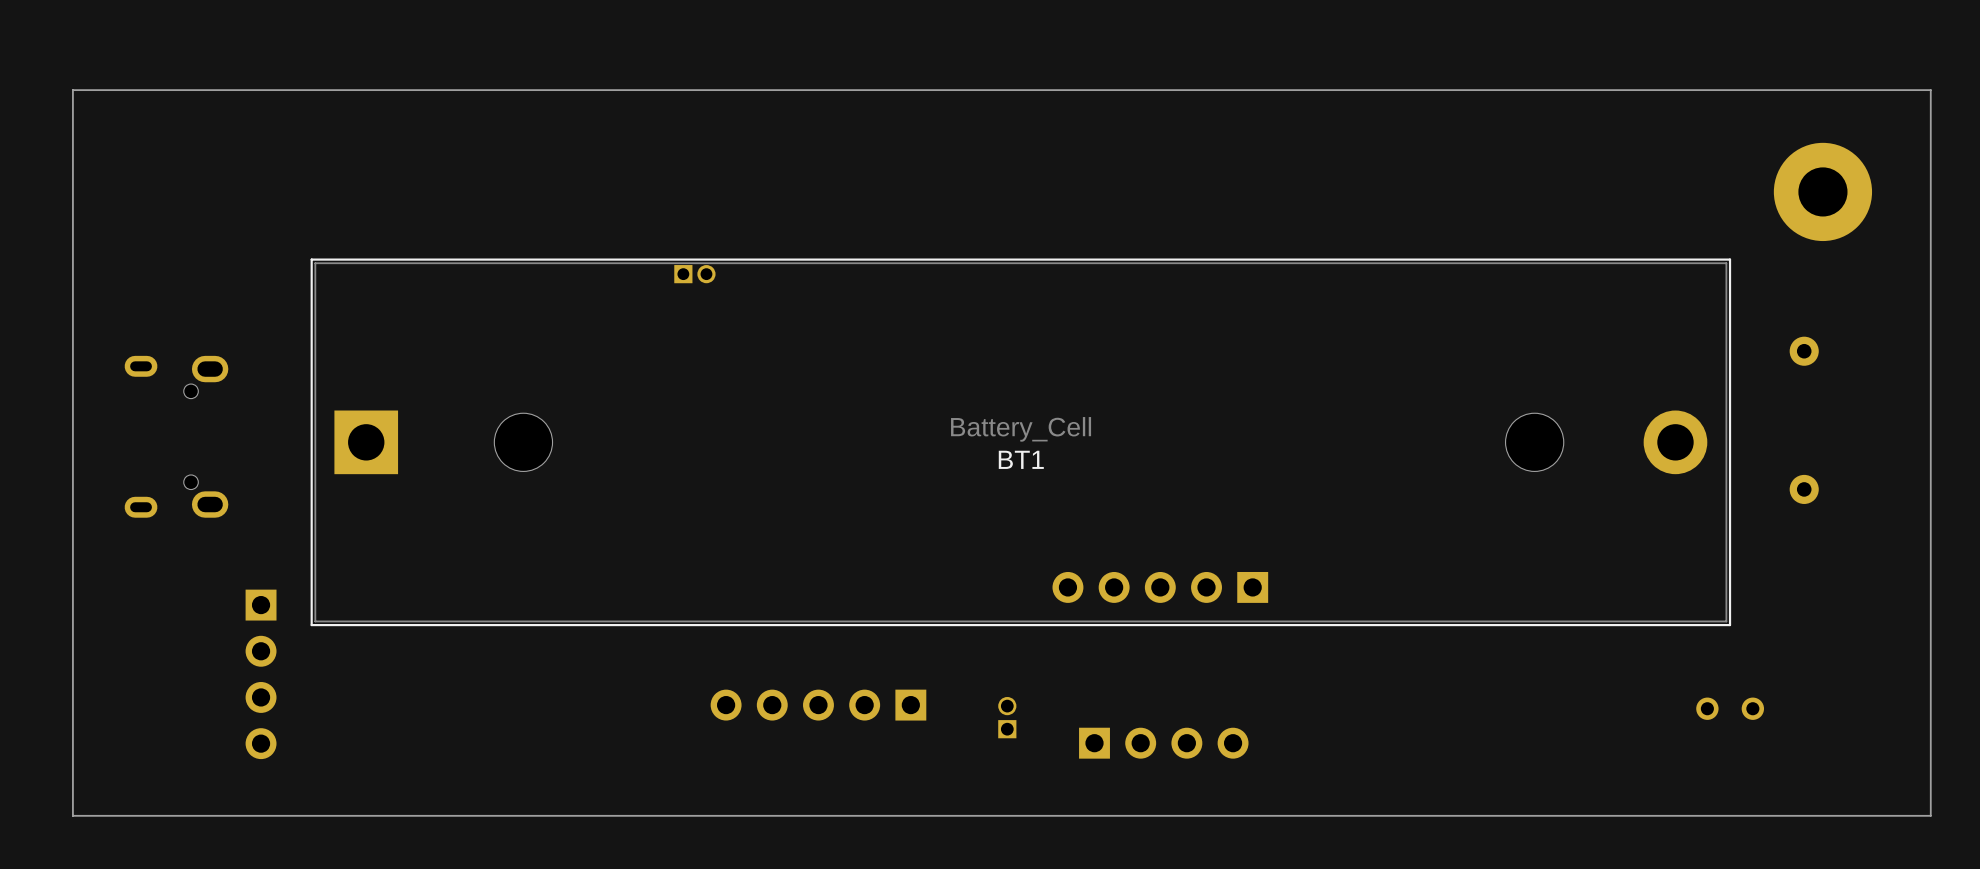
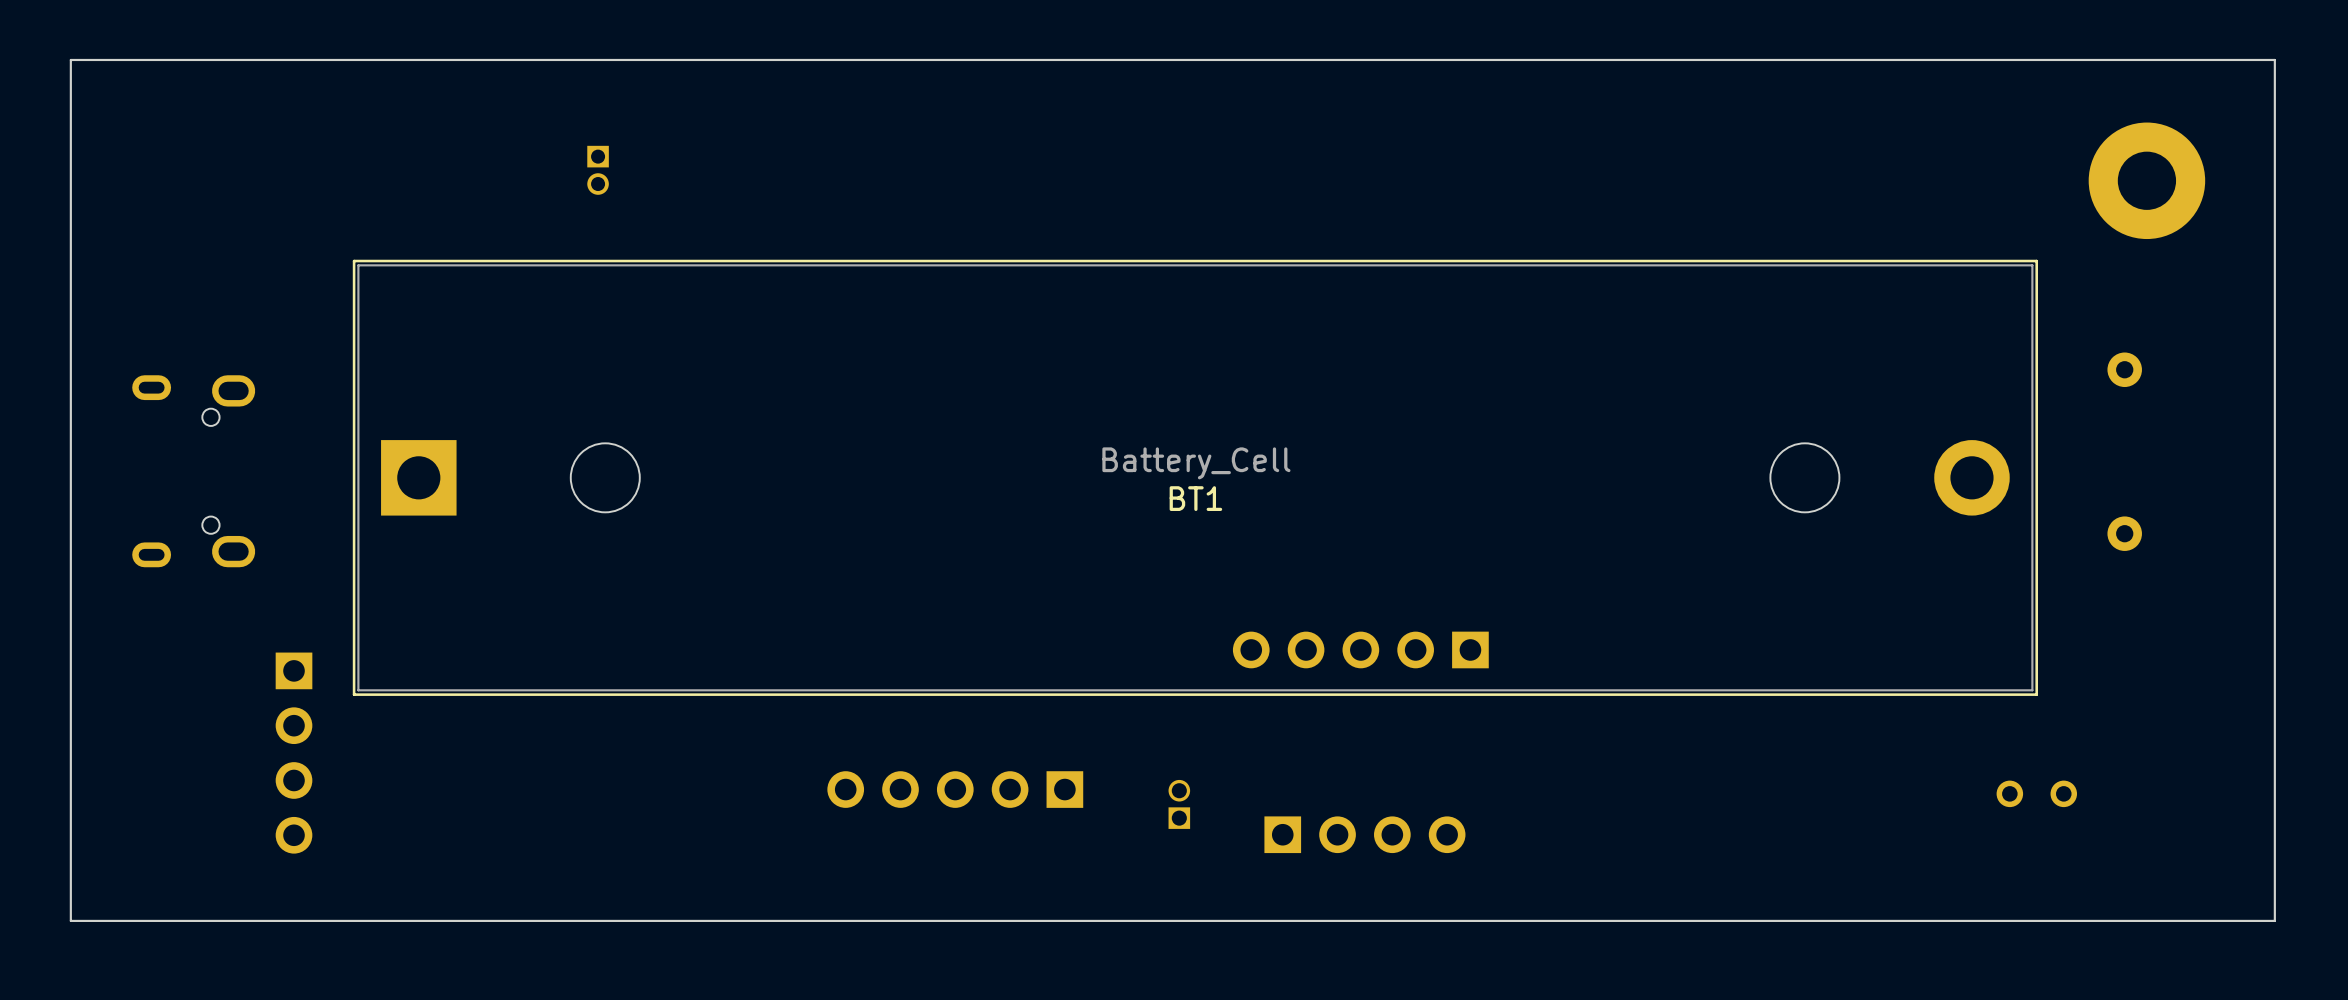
part rotation: 0° (694, 274) -> 90° clockwise (598, 170)
part position: (694, 274) -> (598, 170)

